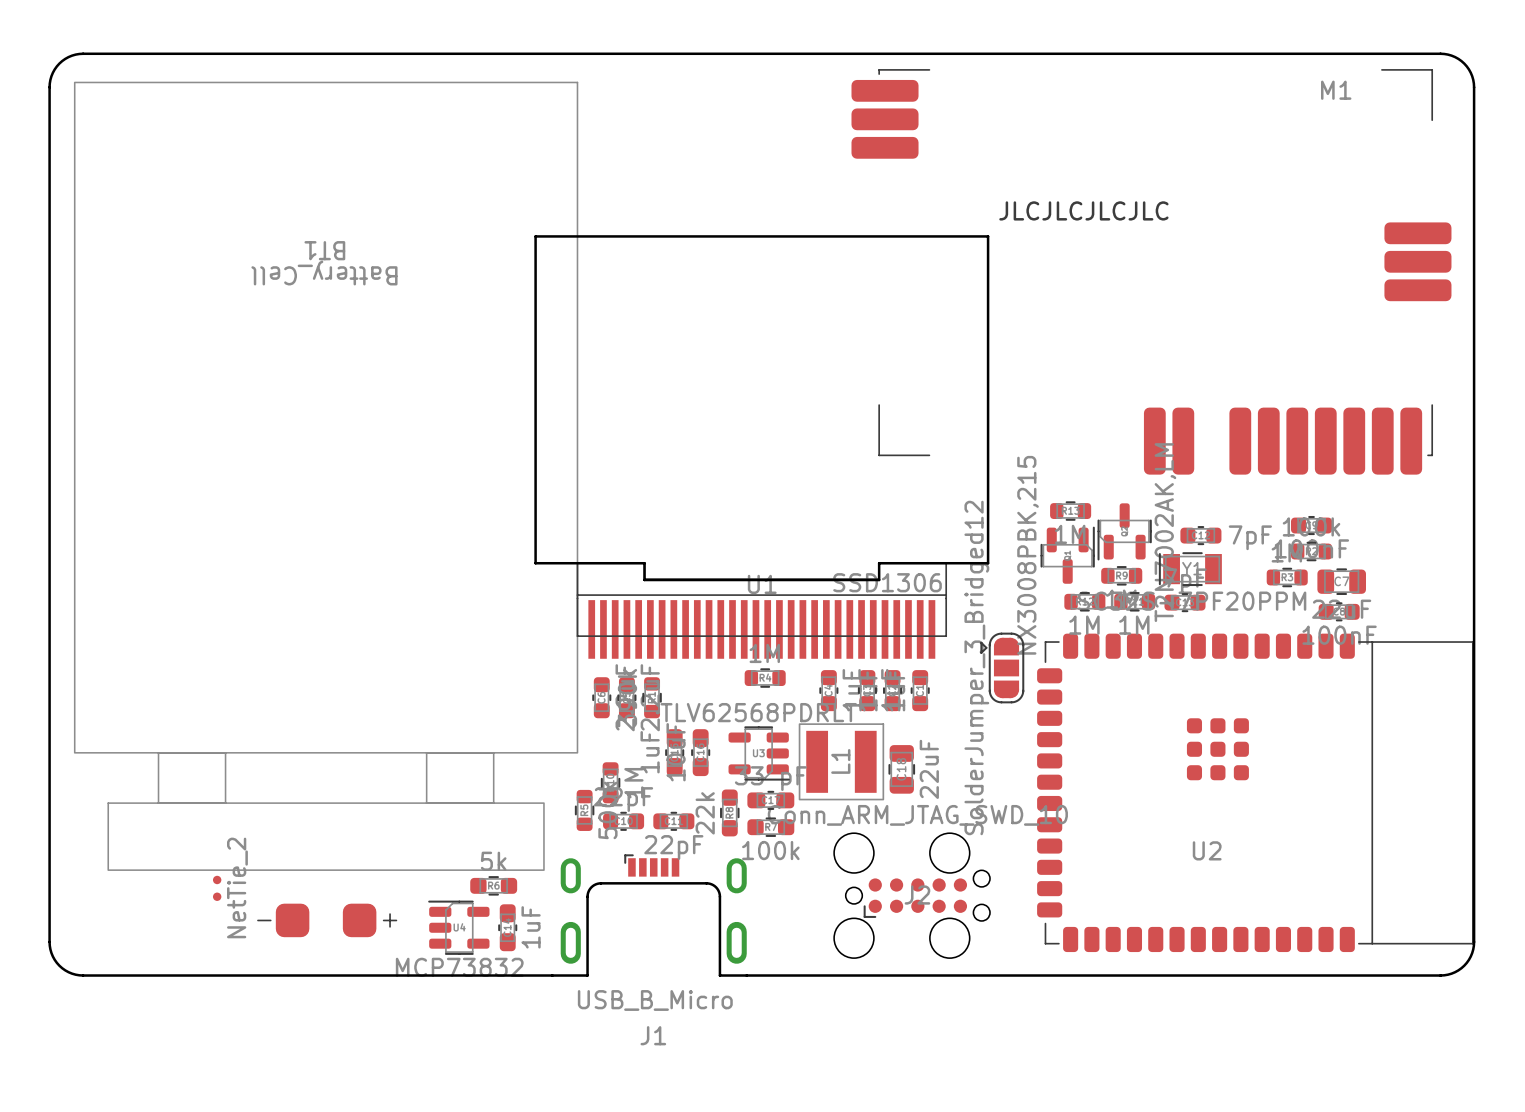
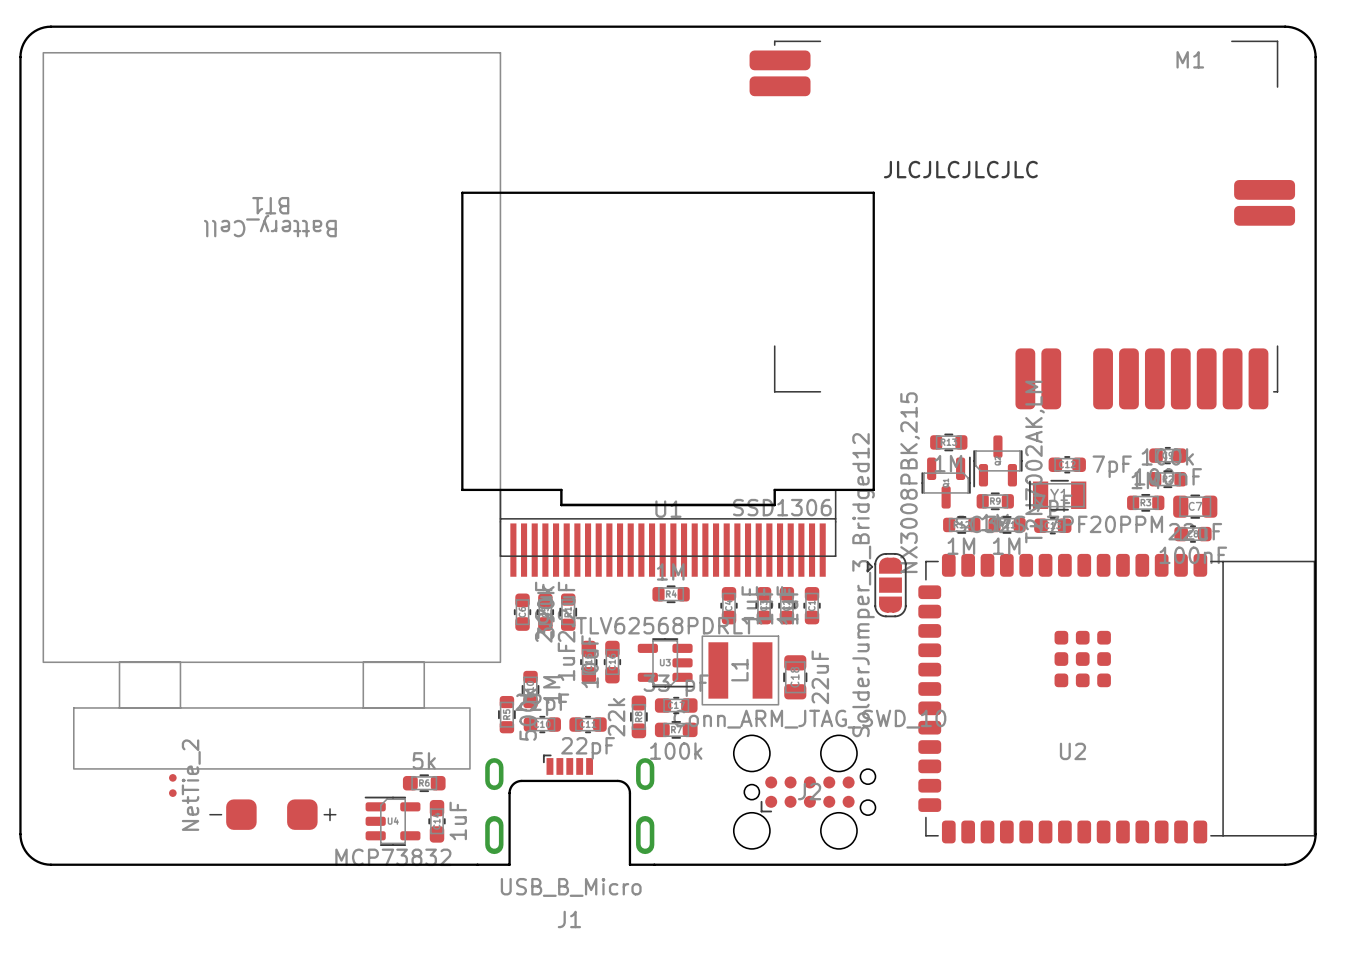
M1 footprint: [851, 69, 1452, 475] -> [749, 40, 1296, 410]

